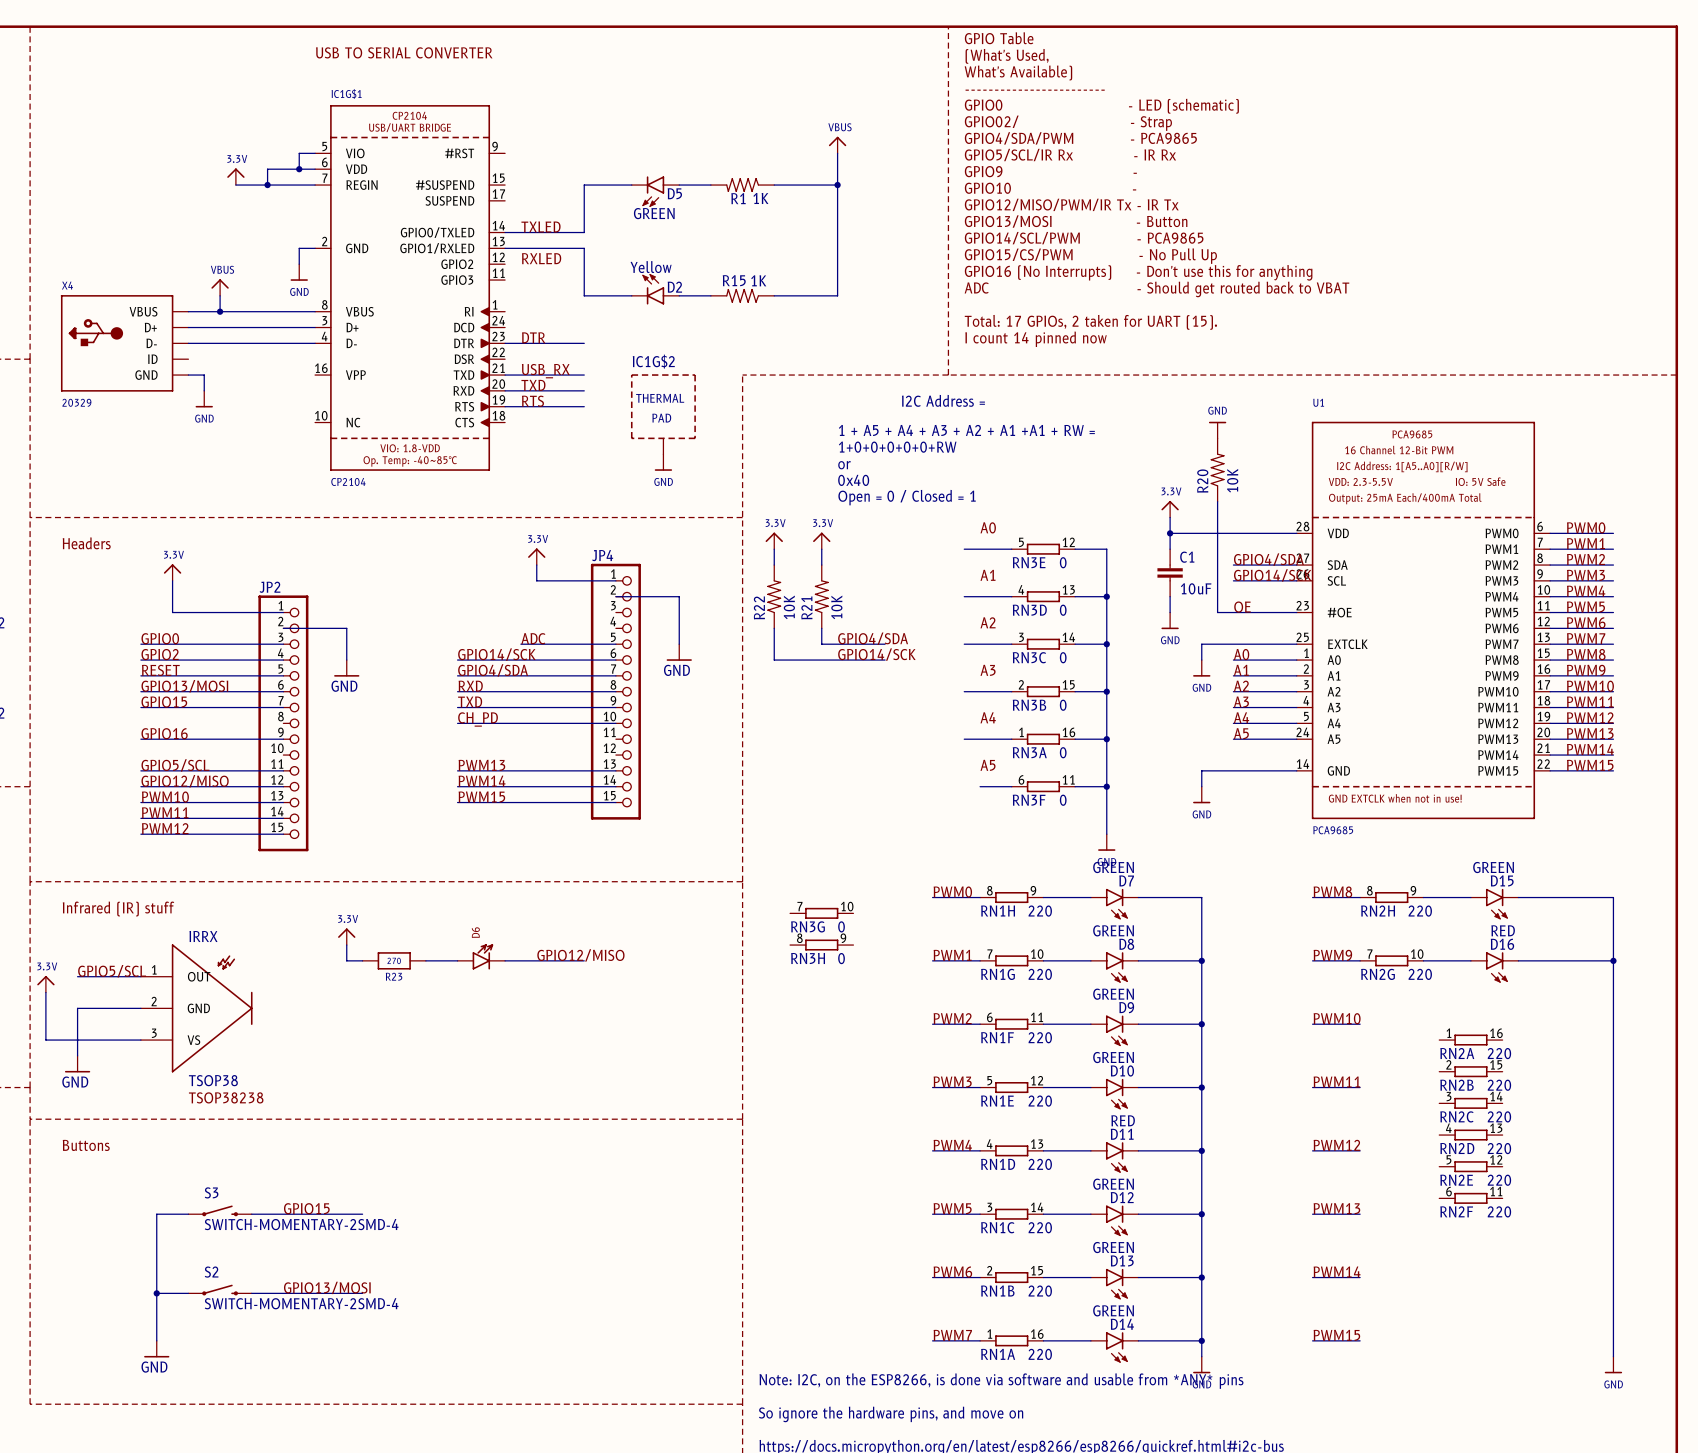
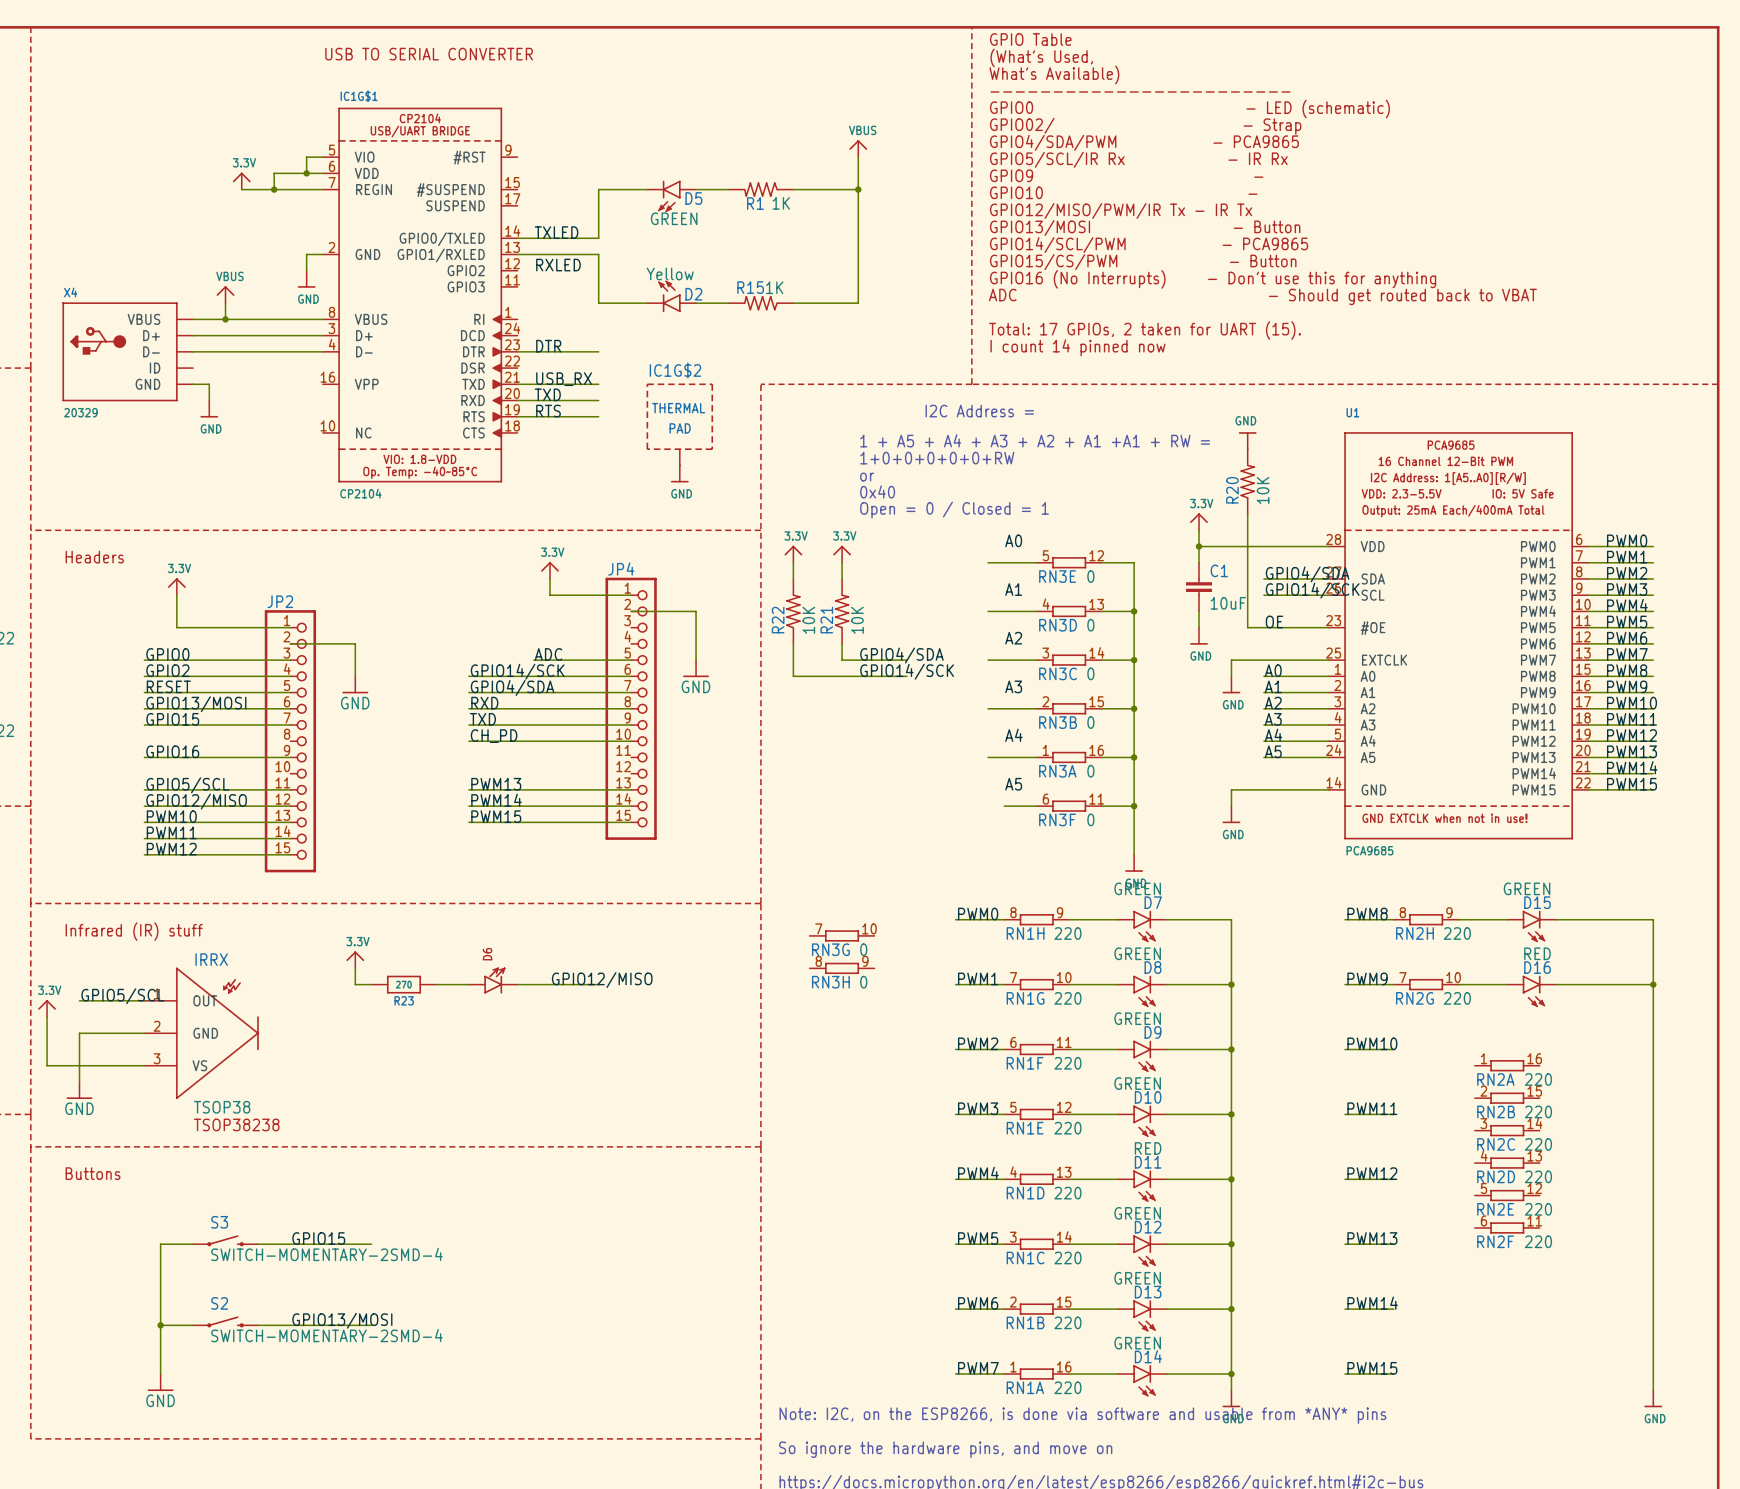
text: GPIO15/CS/PWM - No Pull Up (1090, 256) -> GPIO15/CS/PWM - Button (1143, 262)

